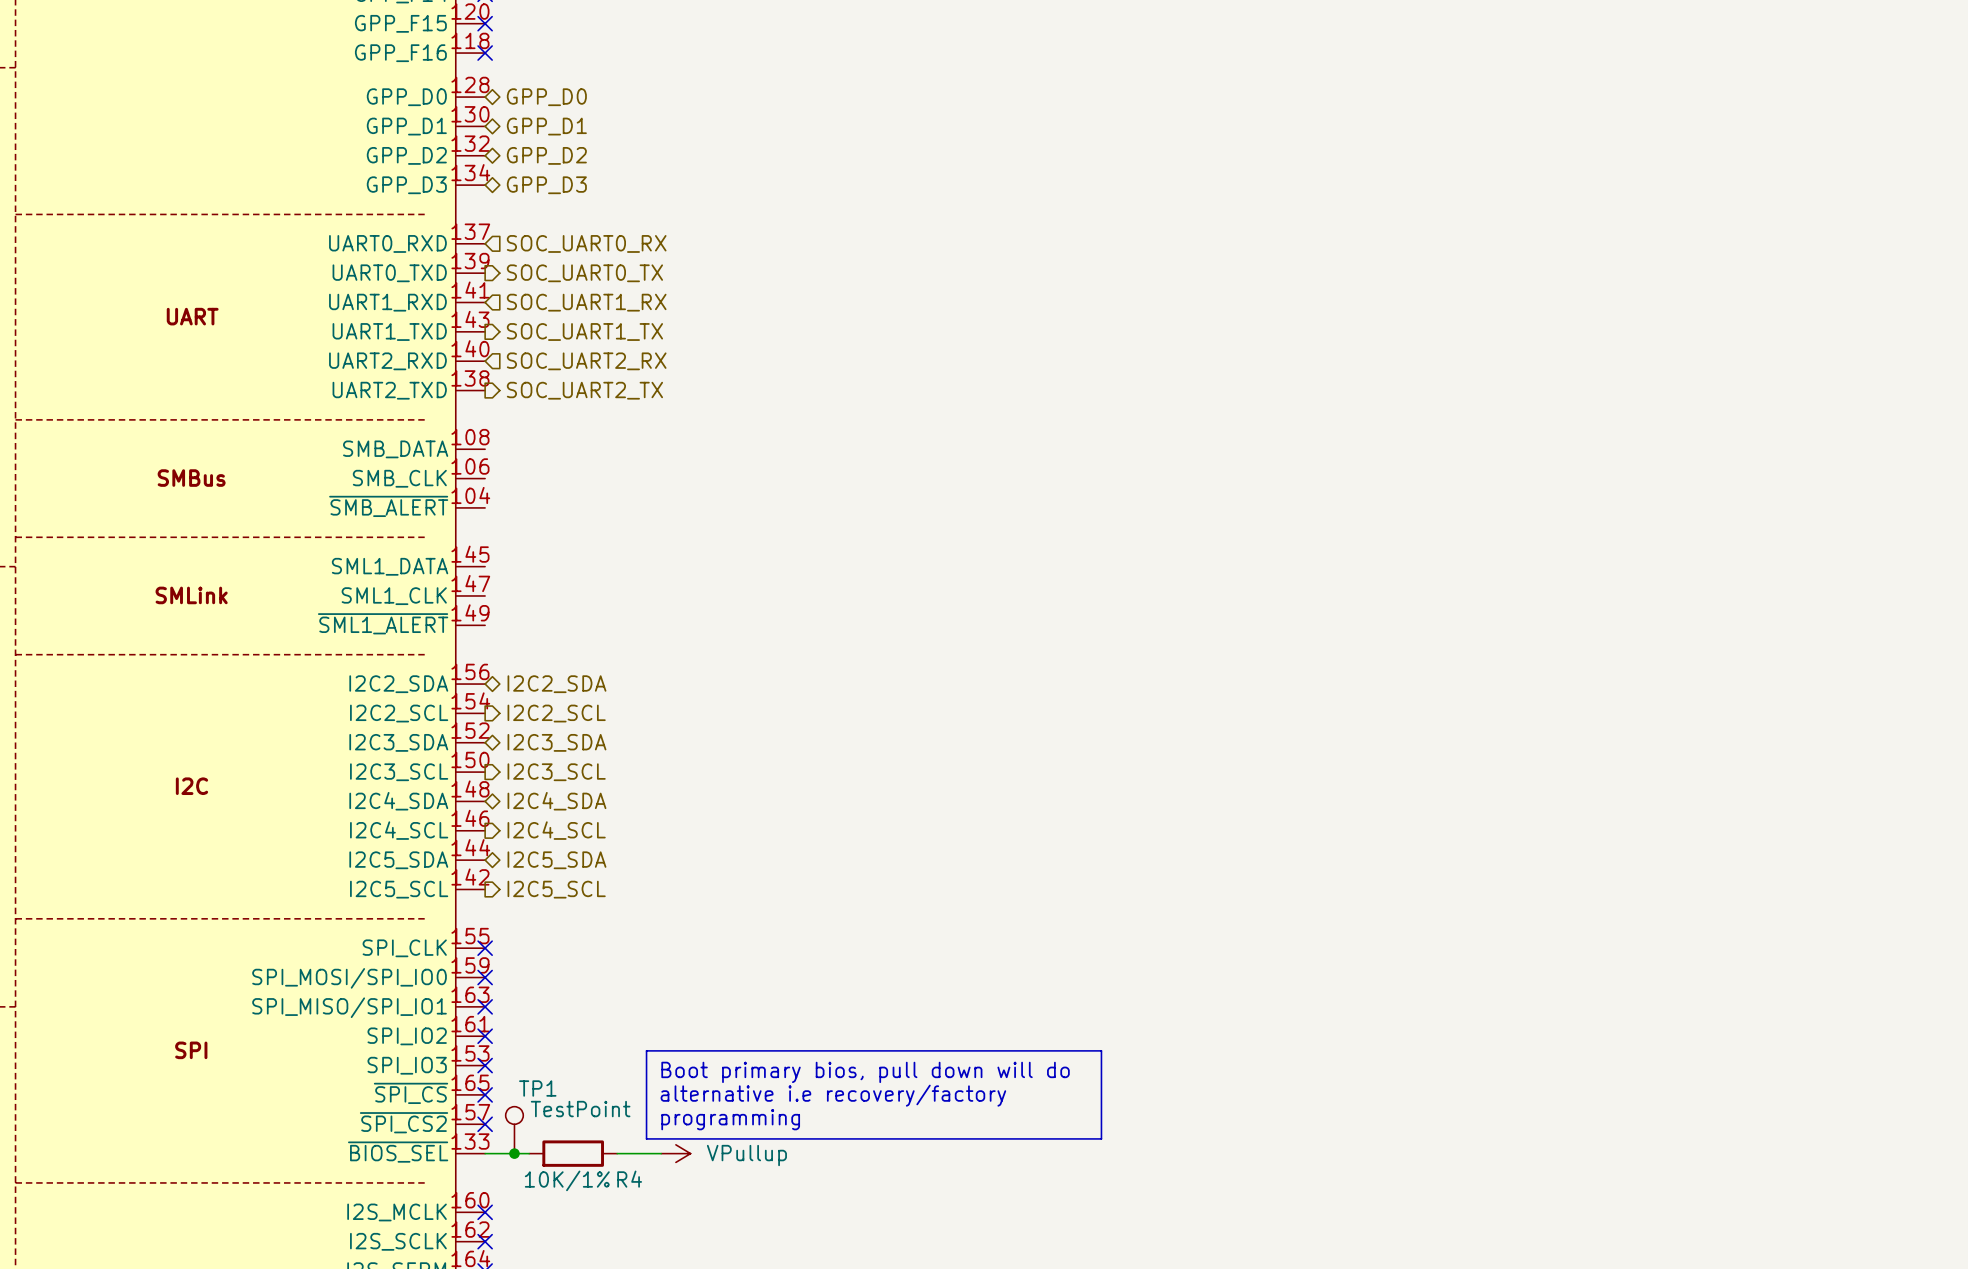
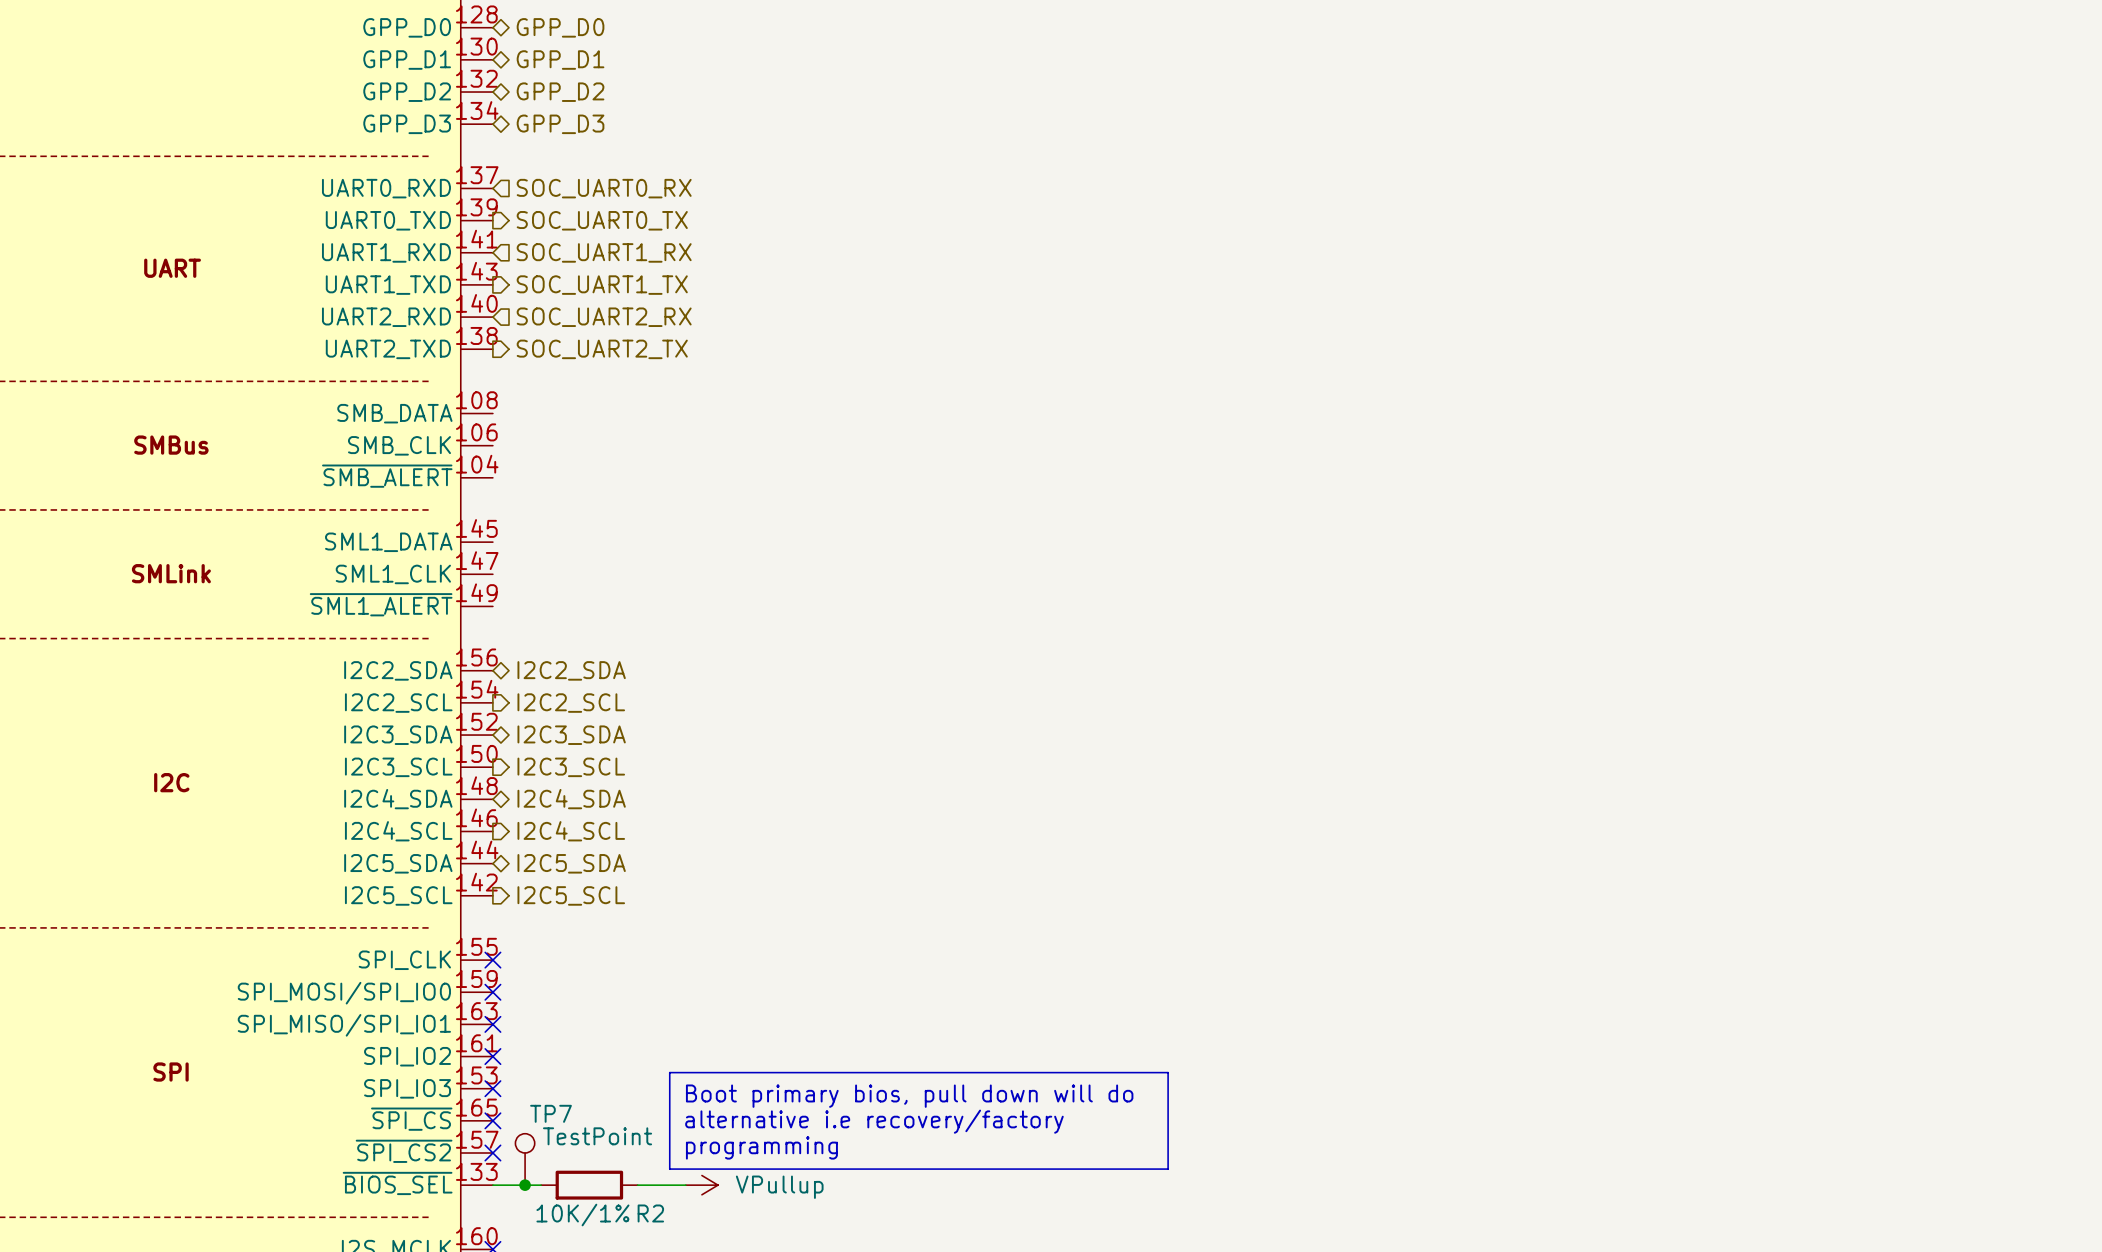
TP1 name: TP1 (537, 1088) -> TP7 (550, 1113)
R4 name: R4 (629, 1179) -> R2 (650, 1213)

